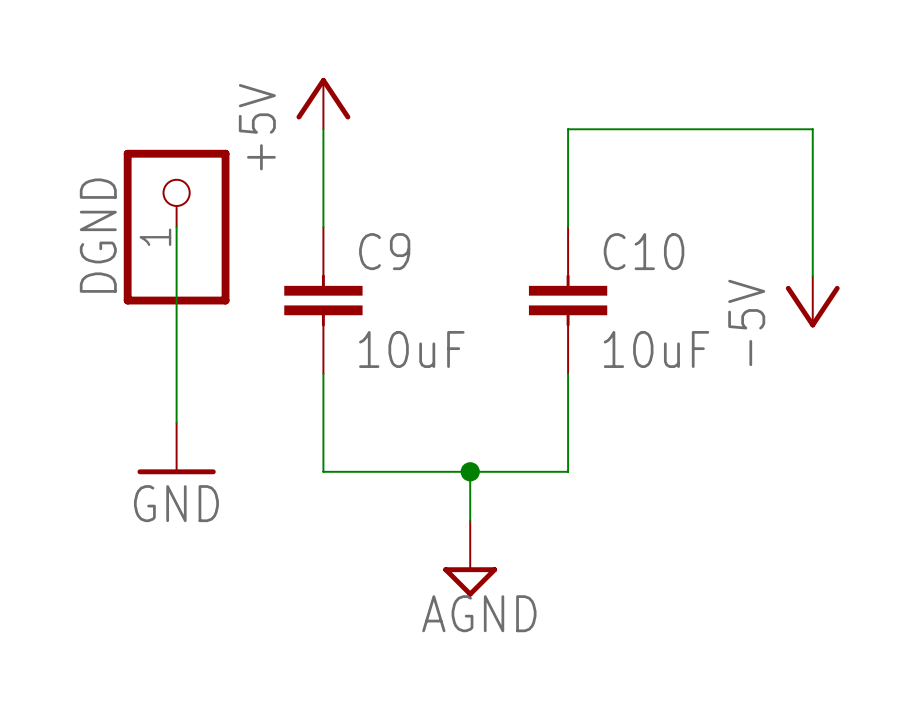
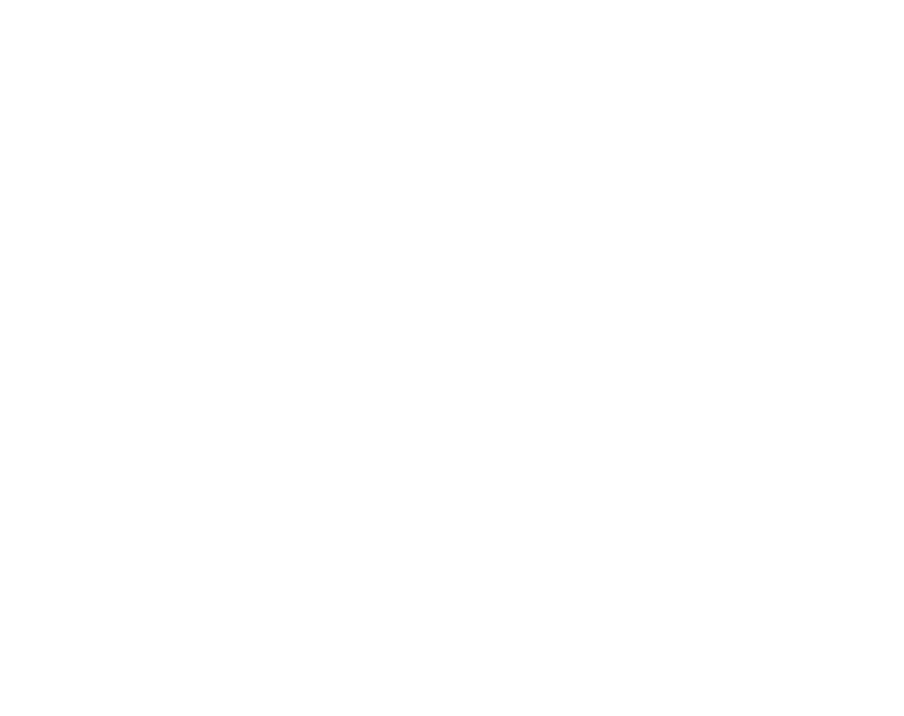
power symbol: +5V (323, 103) -> none
wire: (323, 129) (323, 227) -> none
wire: (176, 227) (176, 422) -> none
DGND: (176, 227) -> none
wire: (568, 227) (568, 129) (812, 129) (812, 276) -> none
C9: 10uF (323, 300) -> none
C10: 10uF (568, 300) -> none
power symbol: -5V (812, 301) -> none
wire: (323, 373) (323, 471) (568, 471) (568, 373) -> none
power symbol: GND (176, 448) -> none
wire: (470, 471) (470, 520) -> none
junction: (470, 471) -> none
power symbol: AGND (470, 558) -> none

